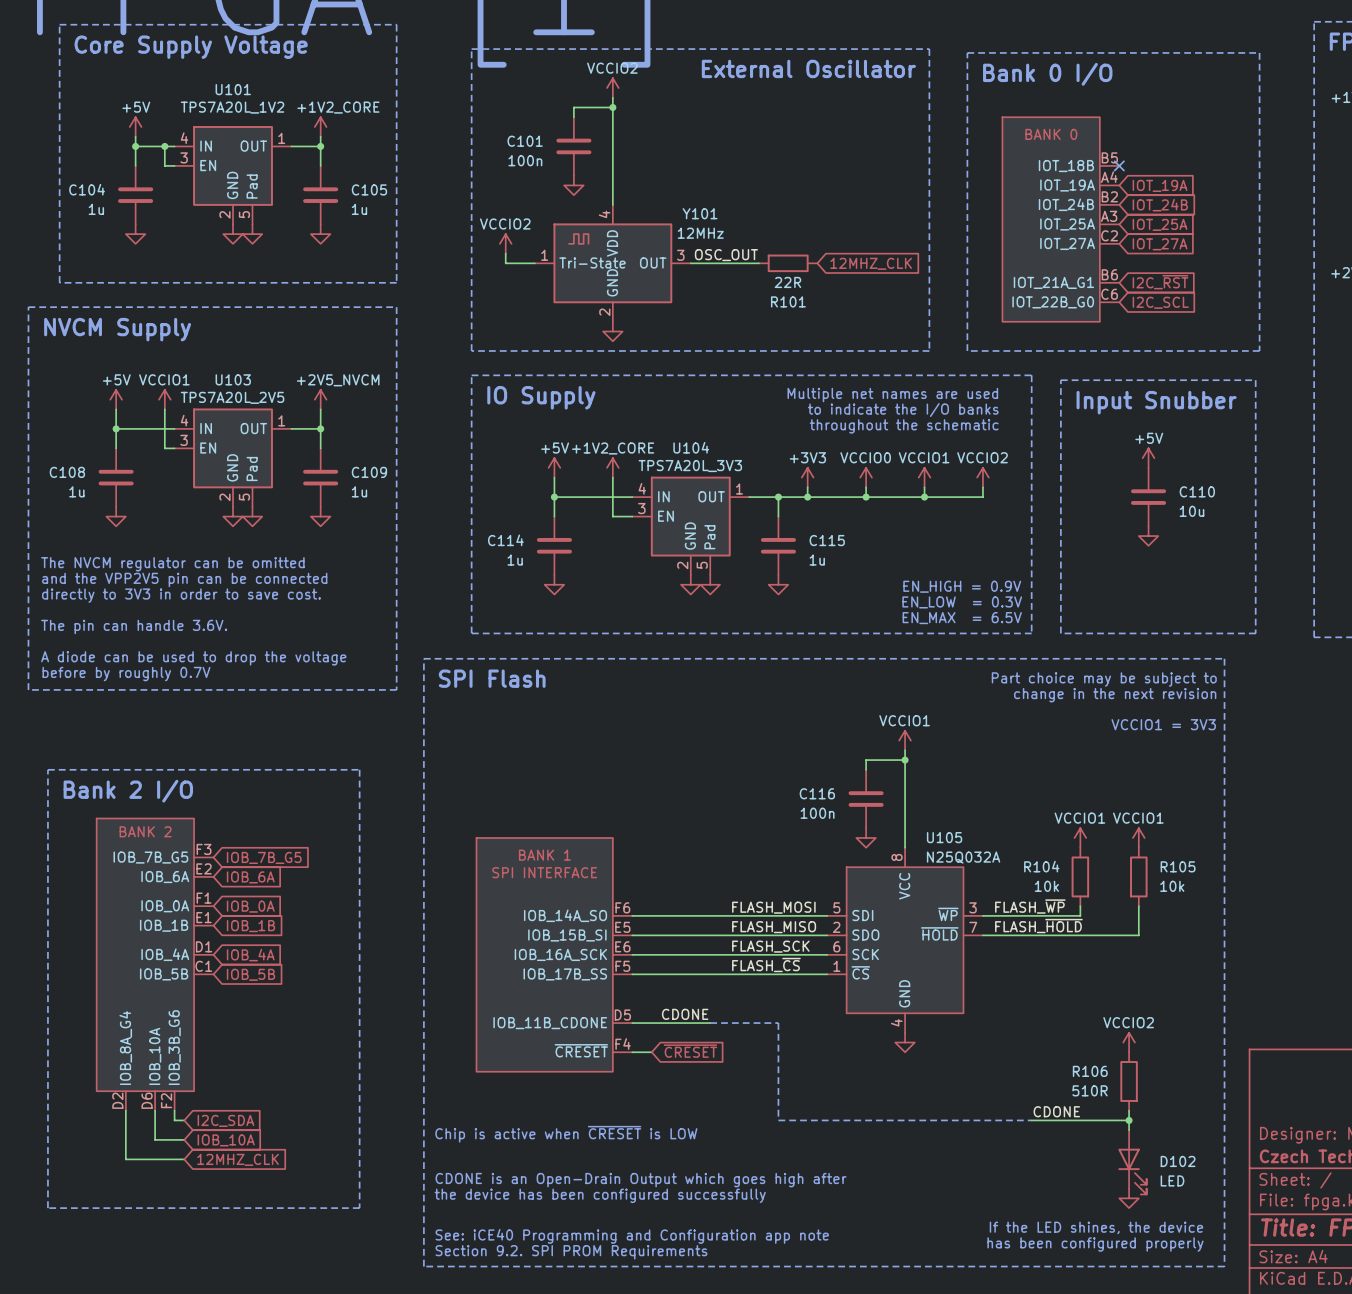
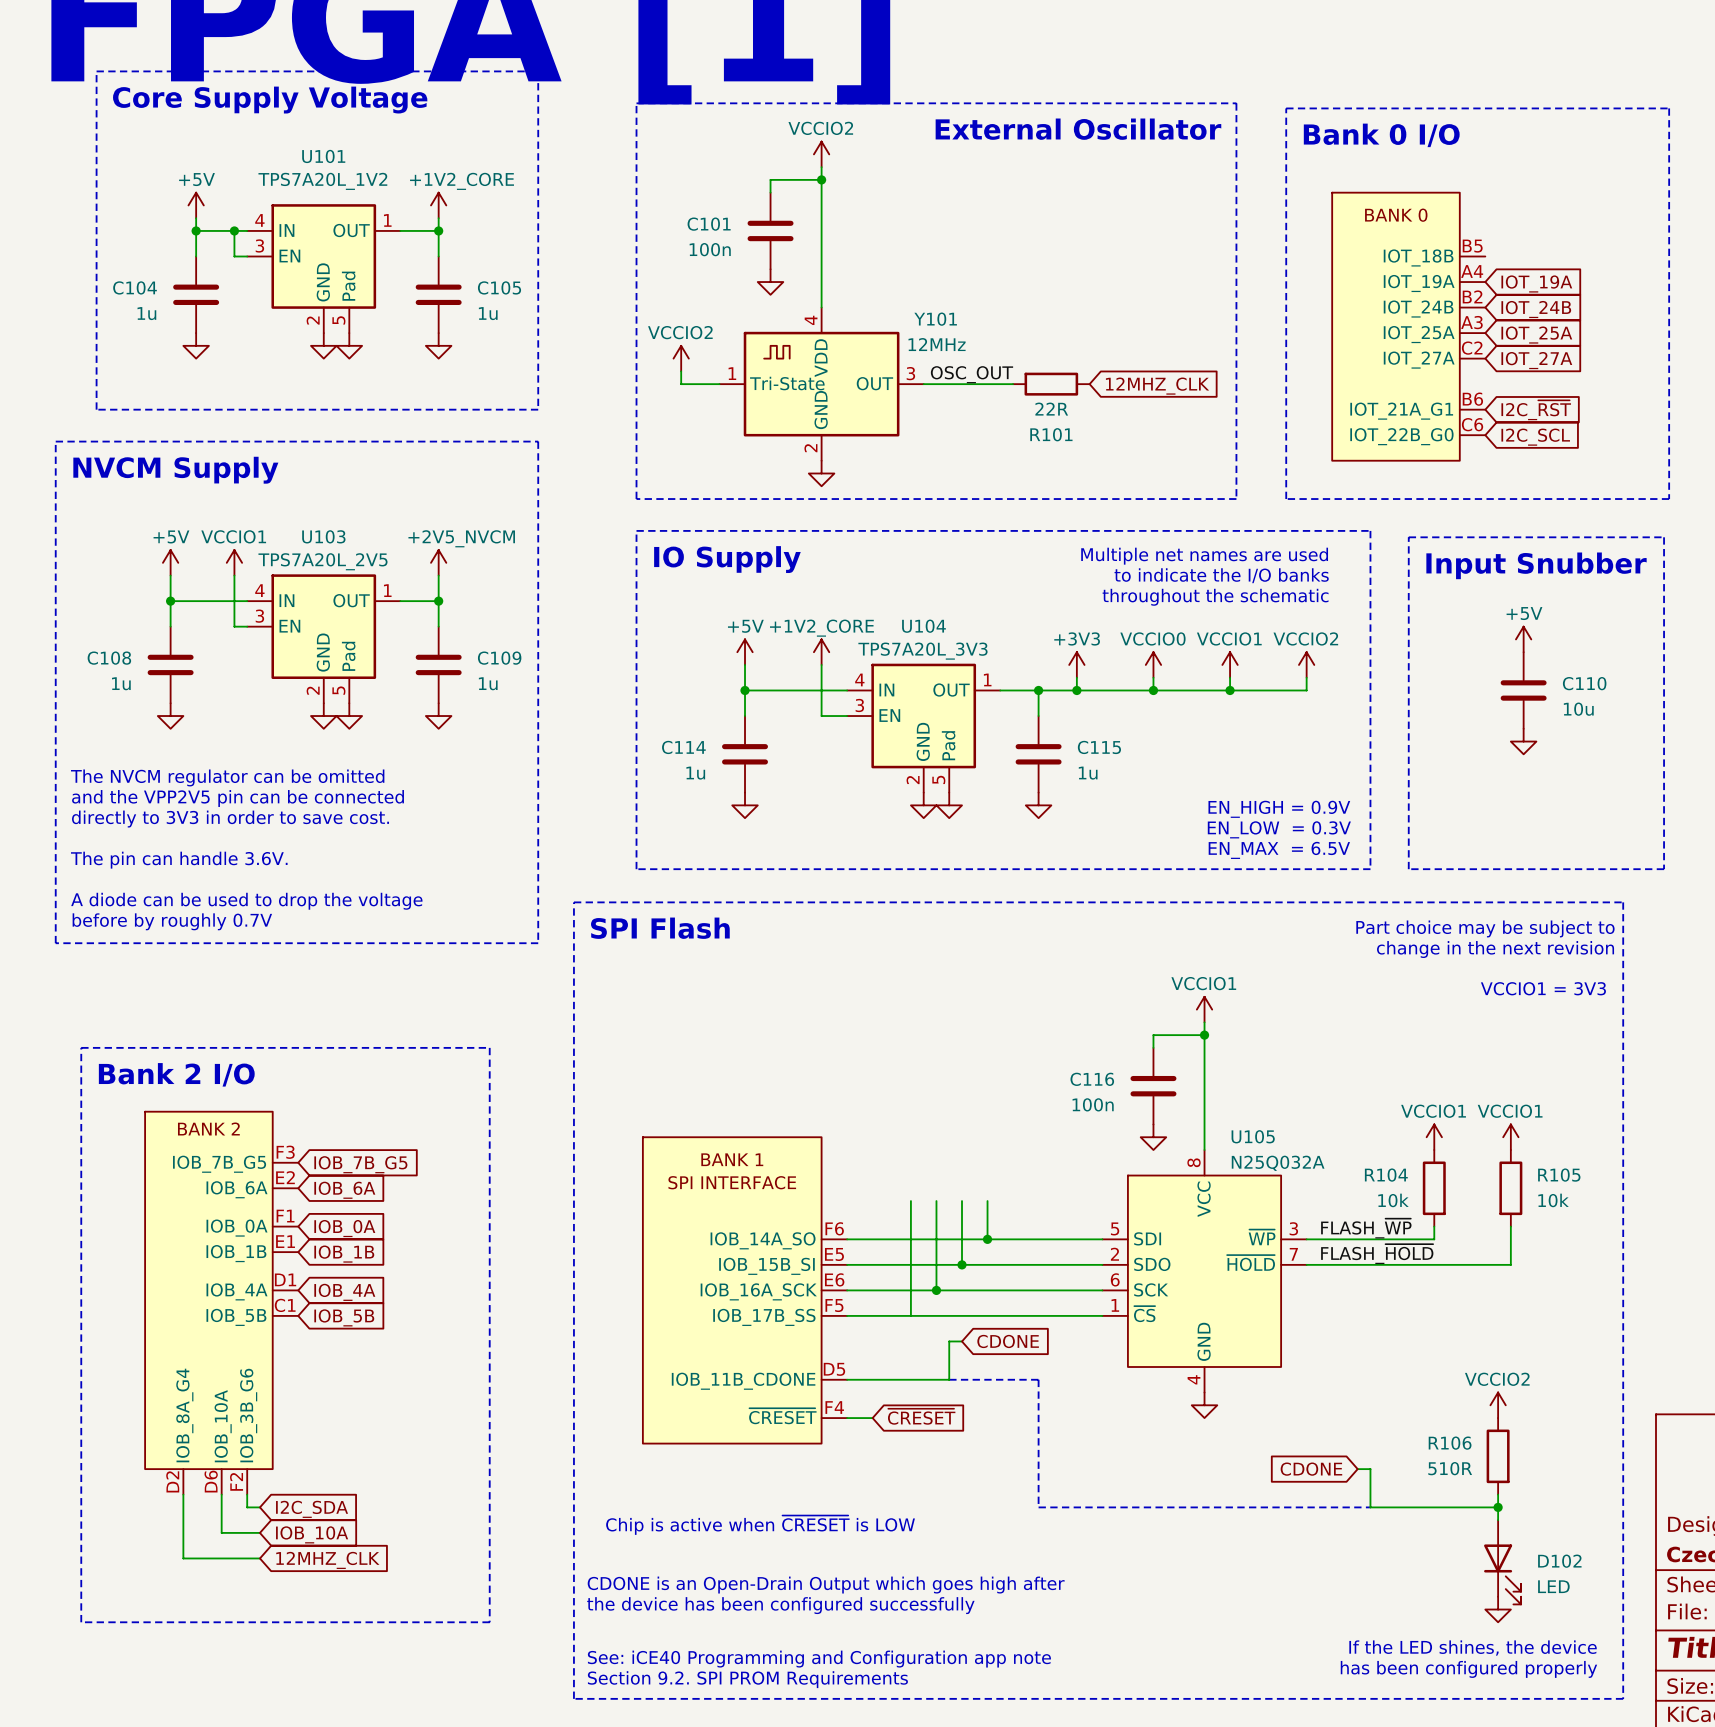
no-connect mark: (1119, 165) -> none
wire: none -> (910, 1201) (910, 1315)
wire: none -> (936, 1201) (936, 1290)
wire: none -> (962, 1201) (962, 1264)
wire: none -> (987, 1201) (987, 1239)
label: FLASH_MOSI (773, 907) -> none
junction: none -> (987, 1239)
label: FLASH_MISO (774, 927) -> none
junction: none -> (962, 1264)
label: FLASH_SCK (770, 946) -> none
junction: none -> (936, 1290)
label: FLASH_~{CS} (766, 964) -> none
wire: none -> (962, 1341) (949, 1341) (949, 1379)
global label: none -> CDONE (1008, 1341)
label: CDONE (685, 1014) -> none
global label: none -> CDONE (1311, 1469)
wire: none -> (1357, 1469) (1370, 1469) (1370, 1507)
label: CDONE (1056, 1111) -> none

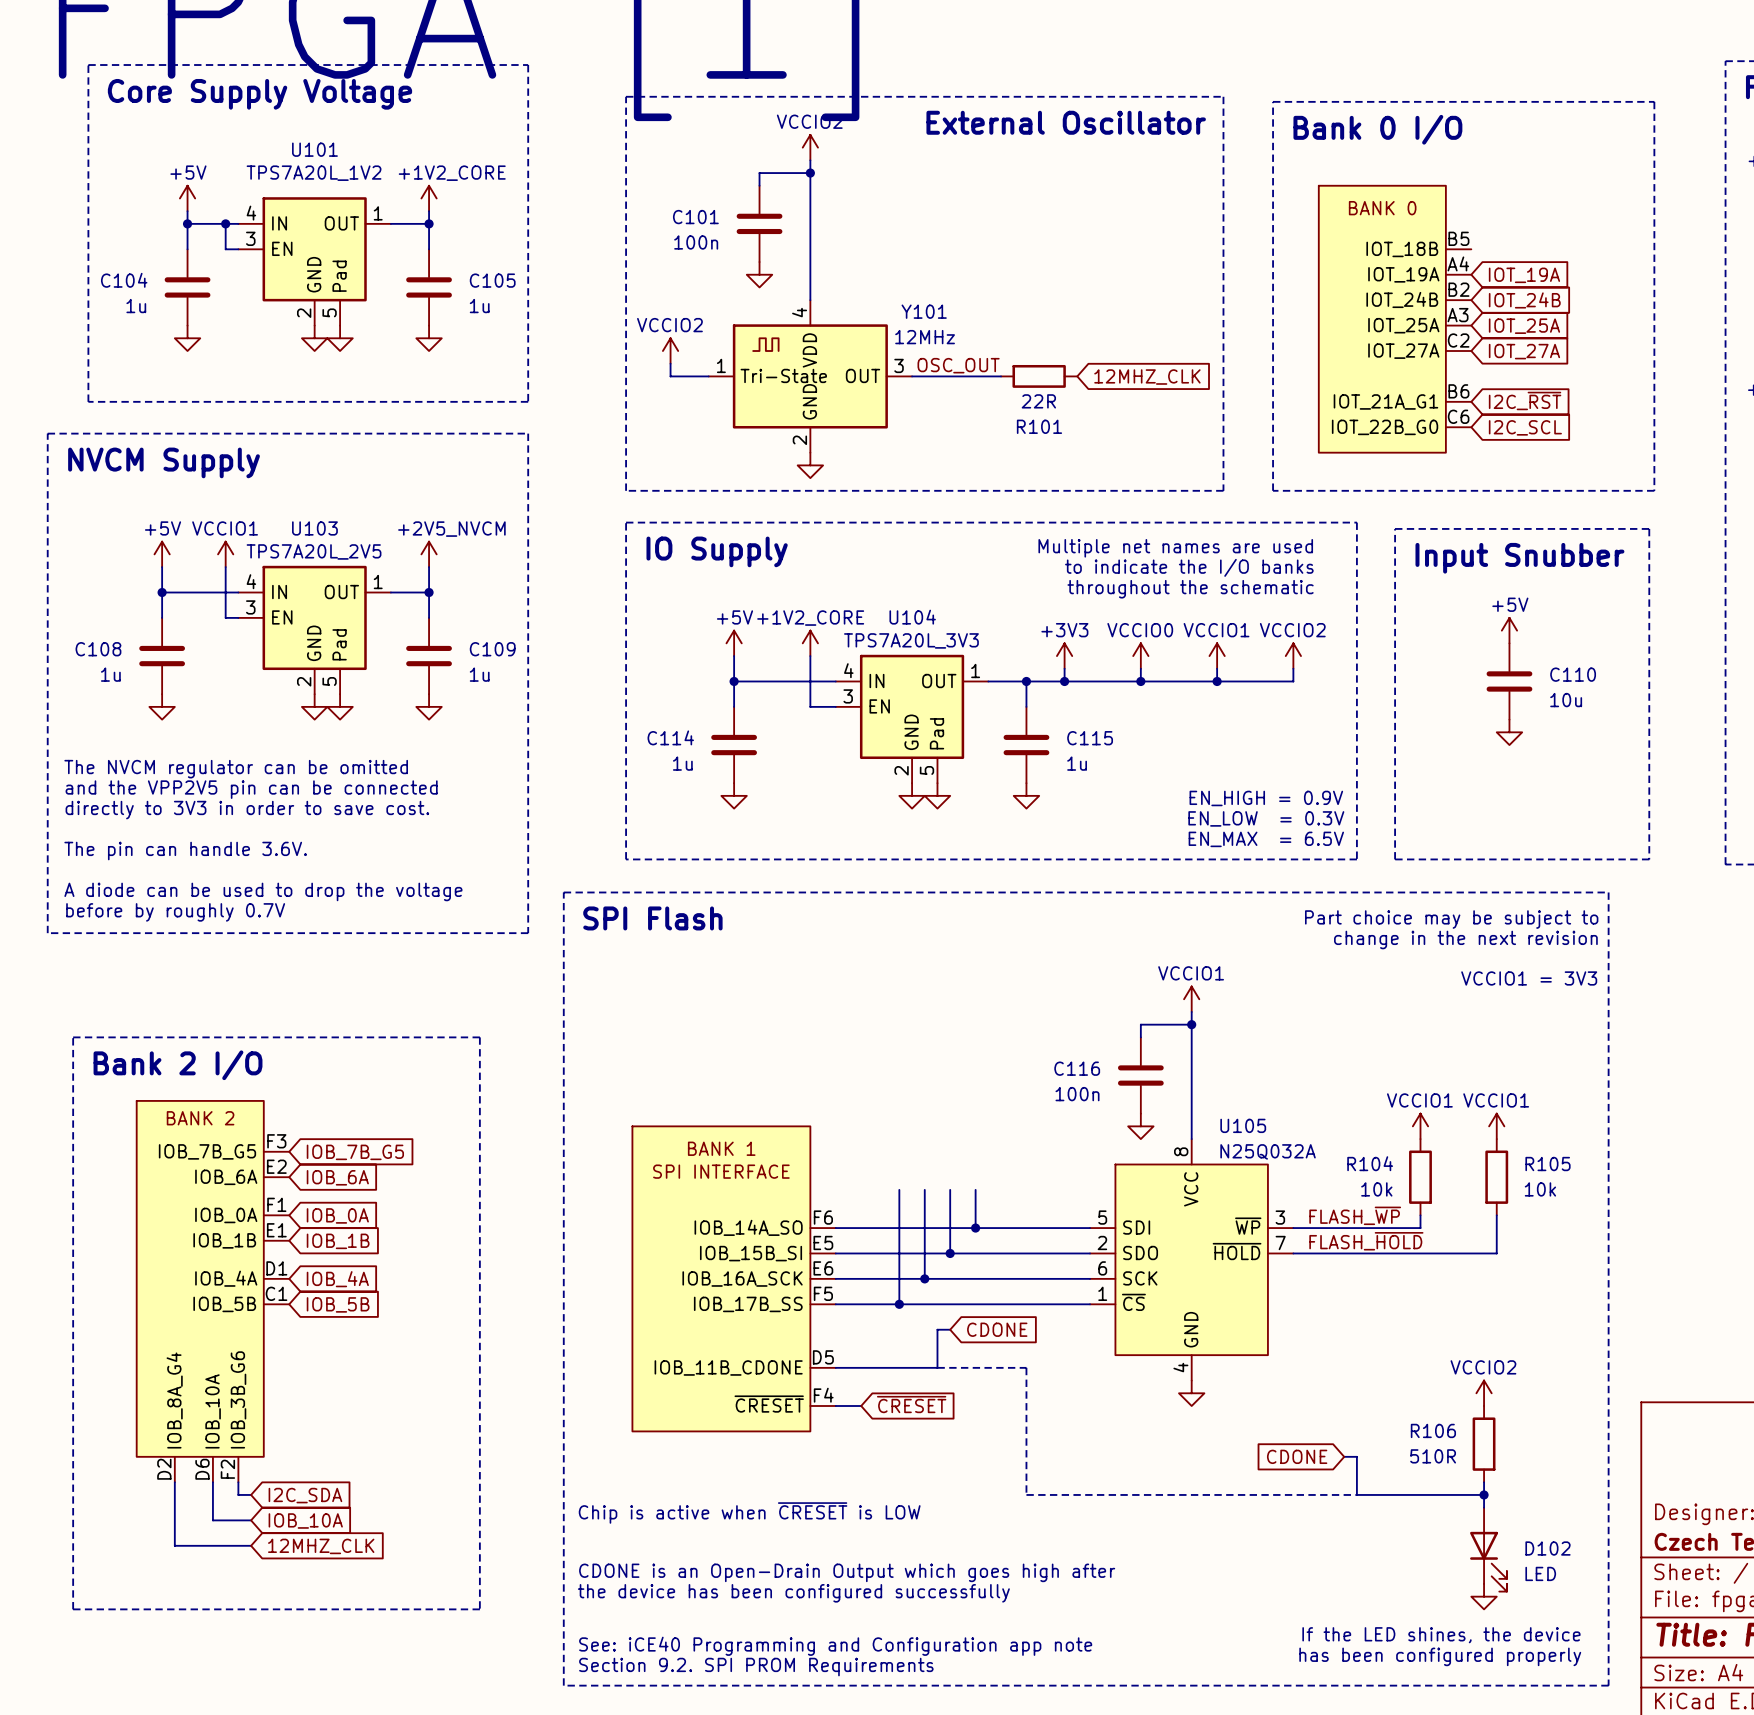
junction: none -> (899, 1304)

